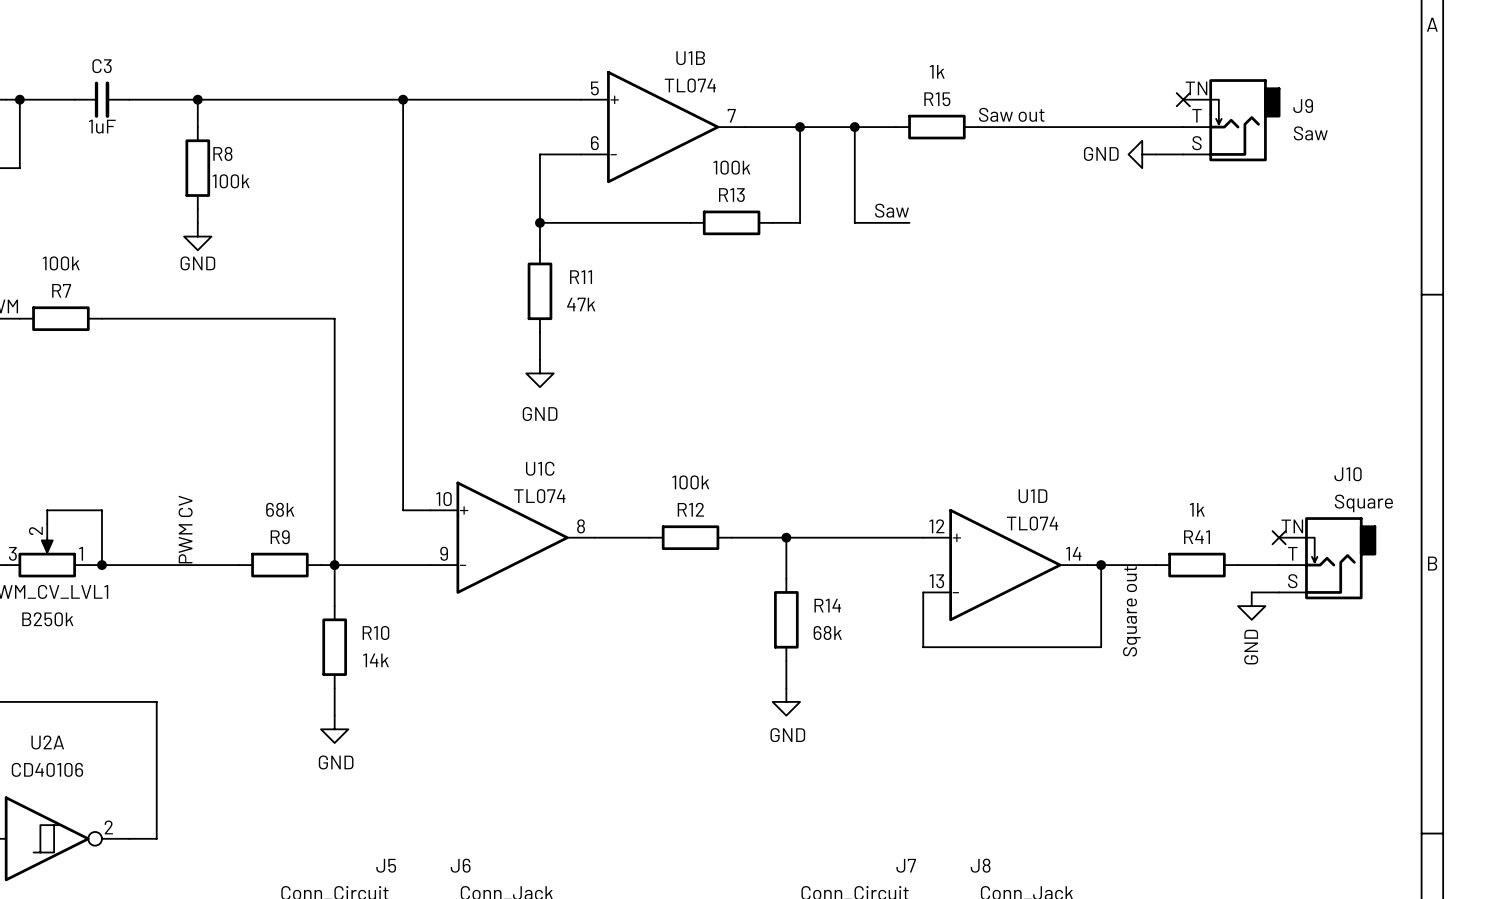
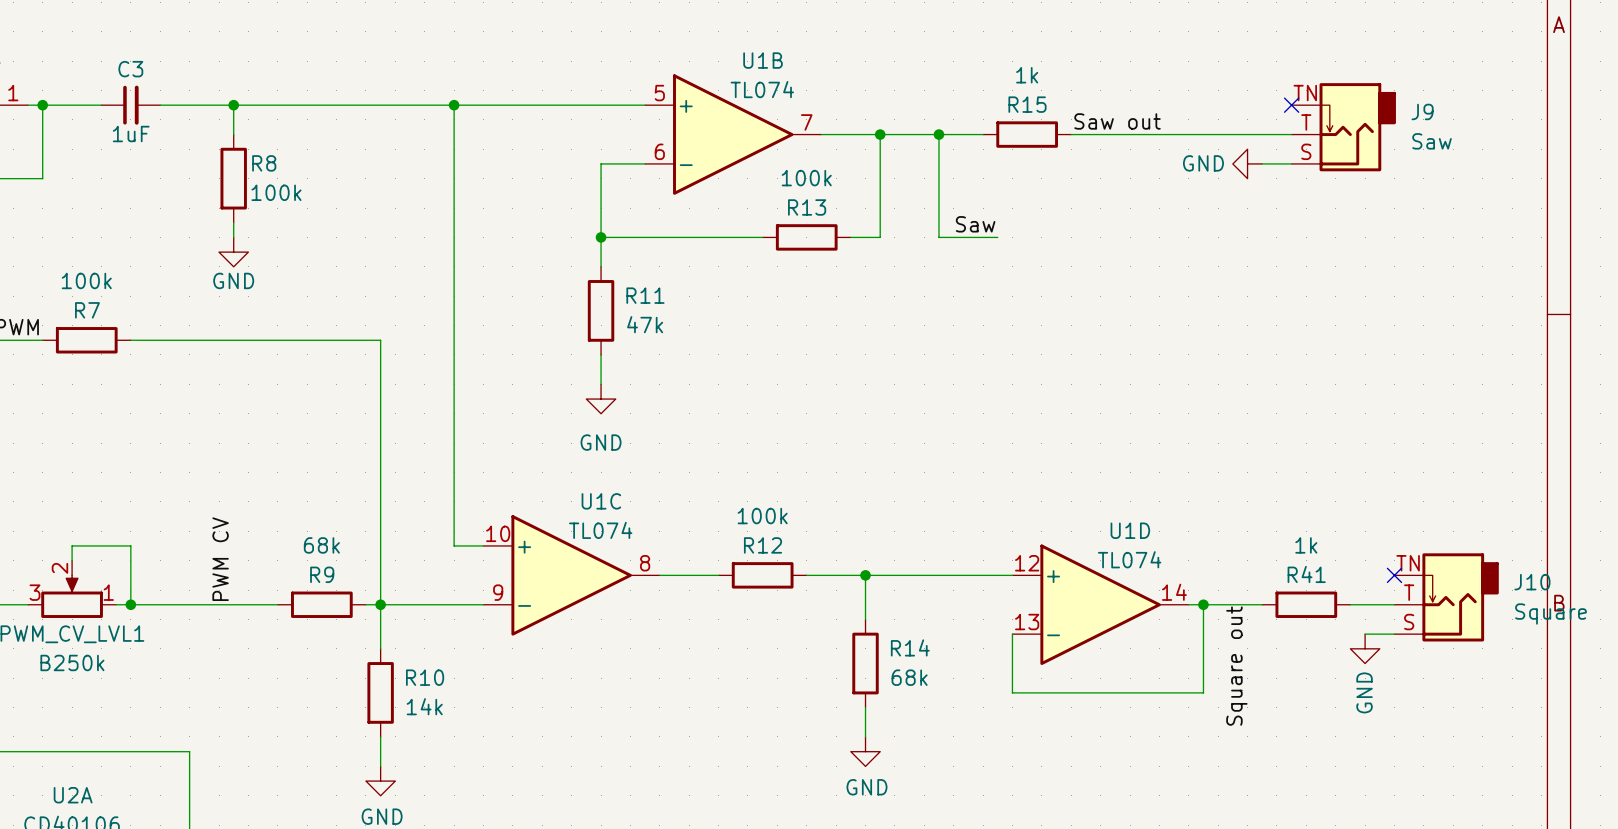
J10 name position: J10 (1348, 474) -> J10 (1532, 582)
J10 value position: Square (1363, 503) -> Square (1550, 614)

